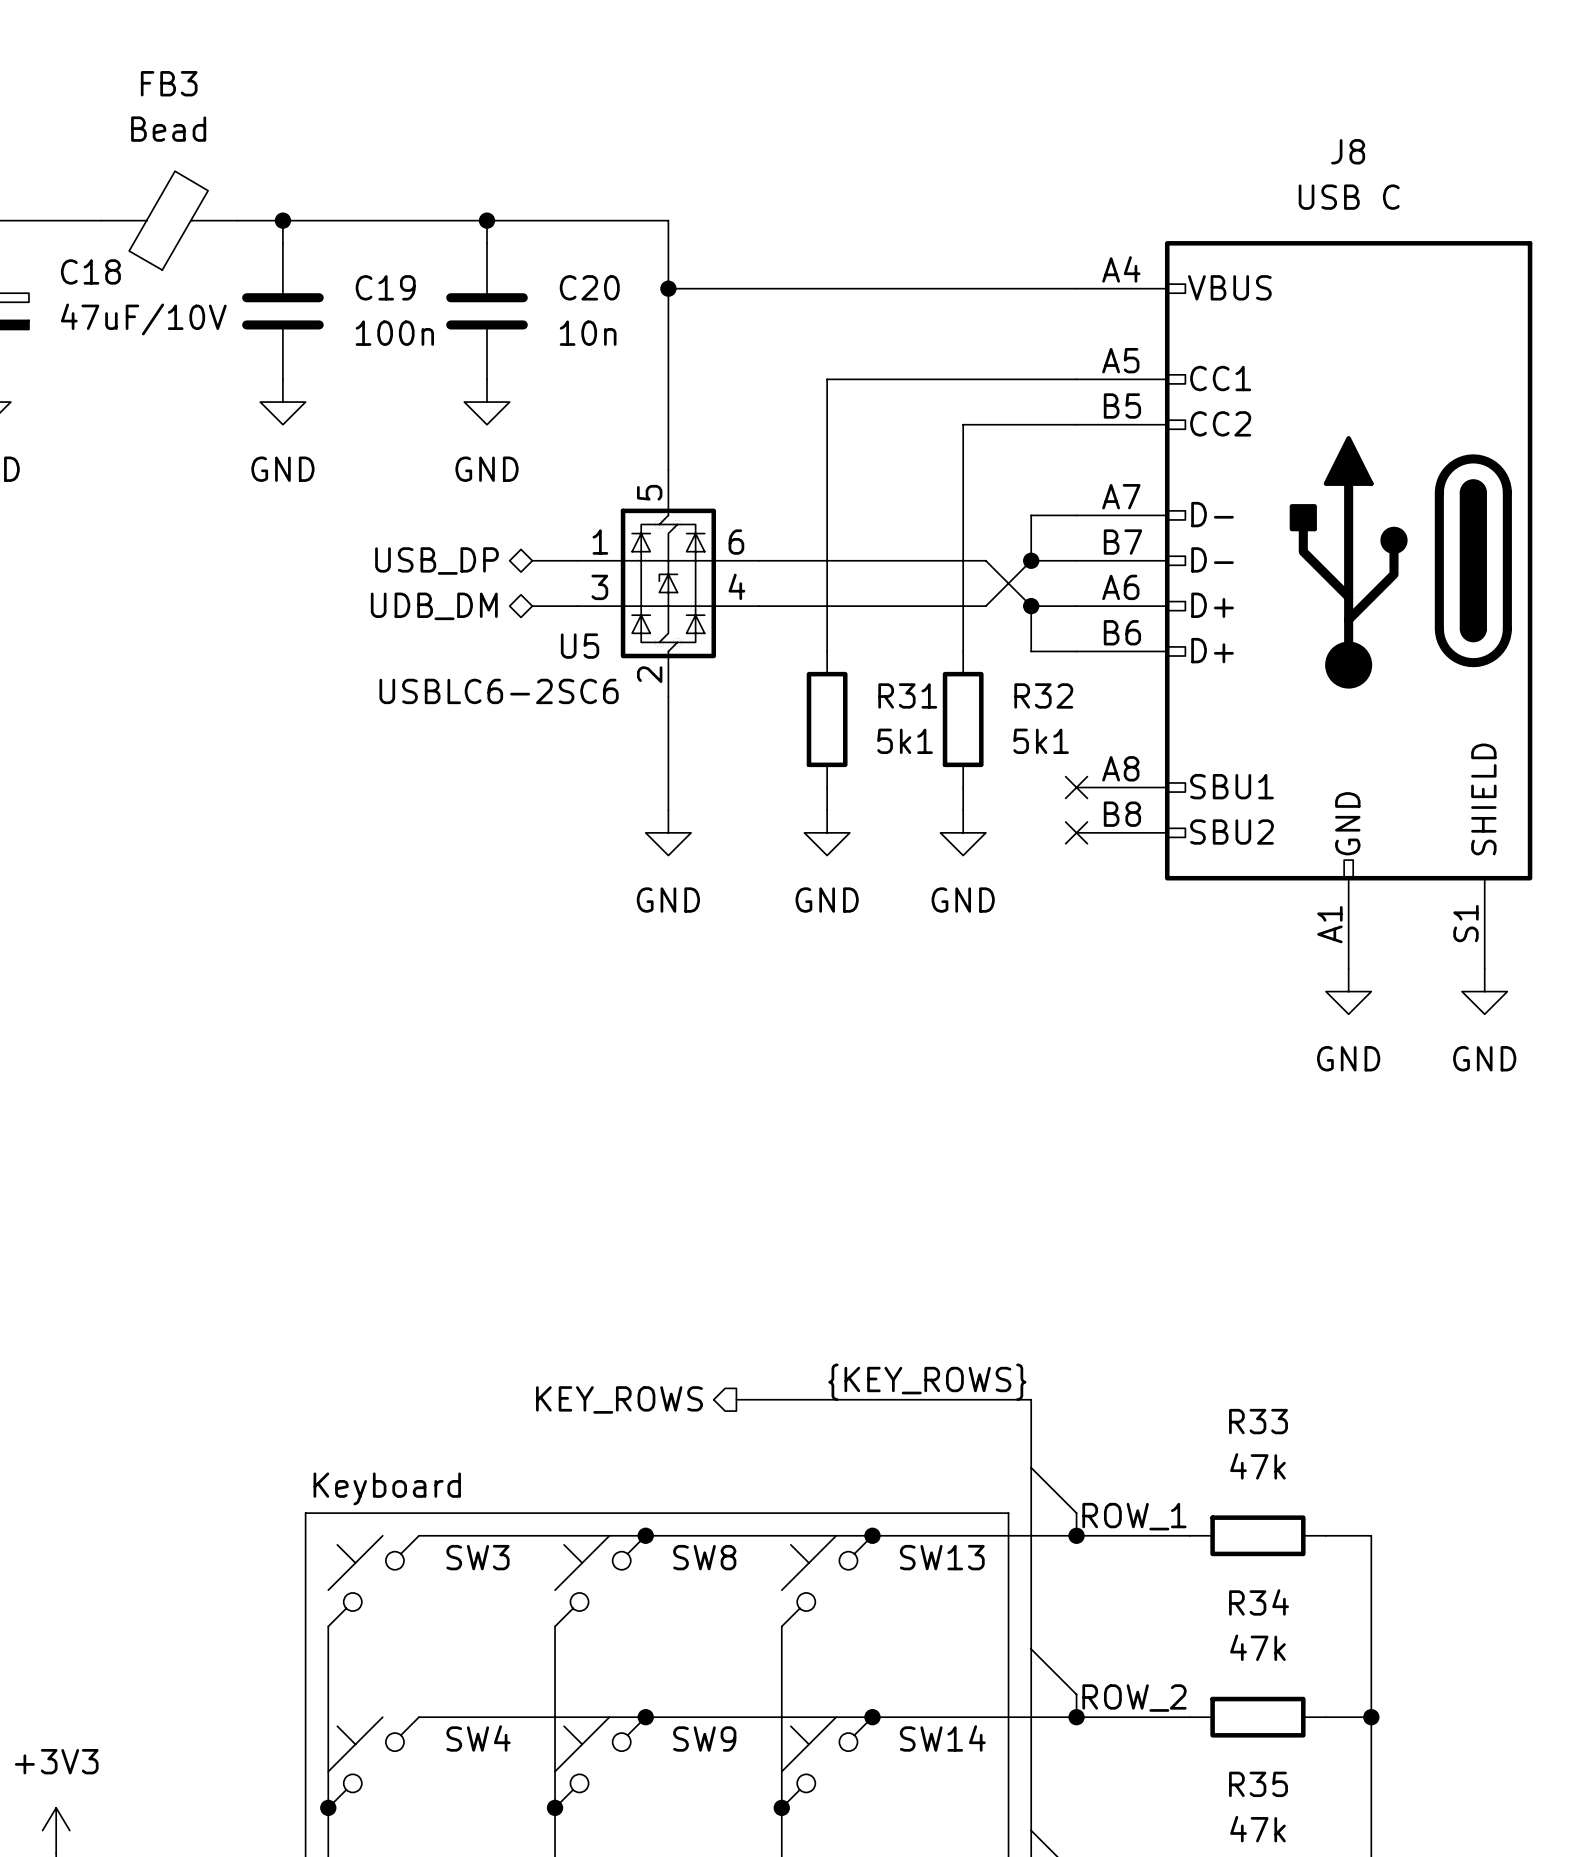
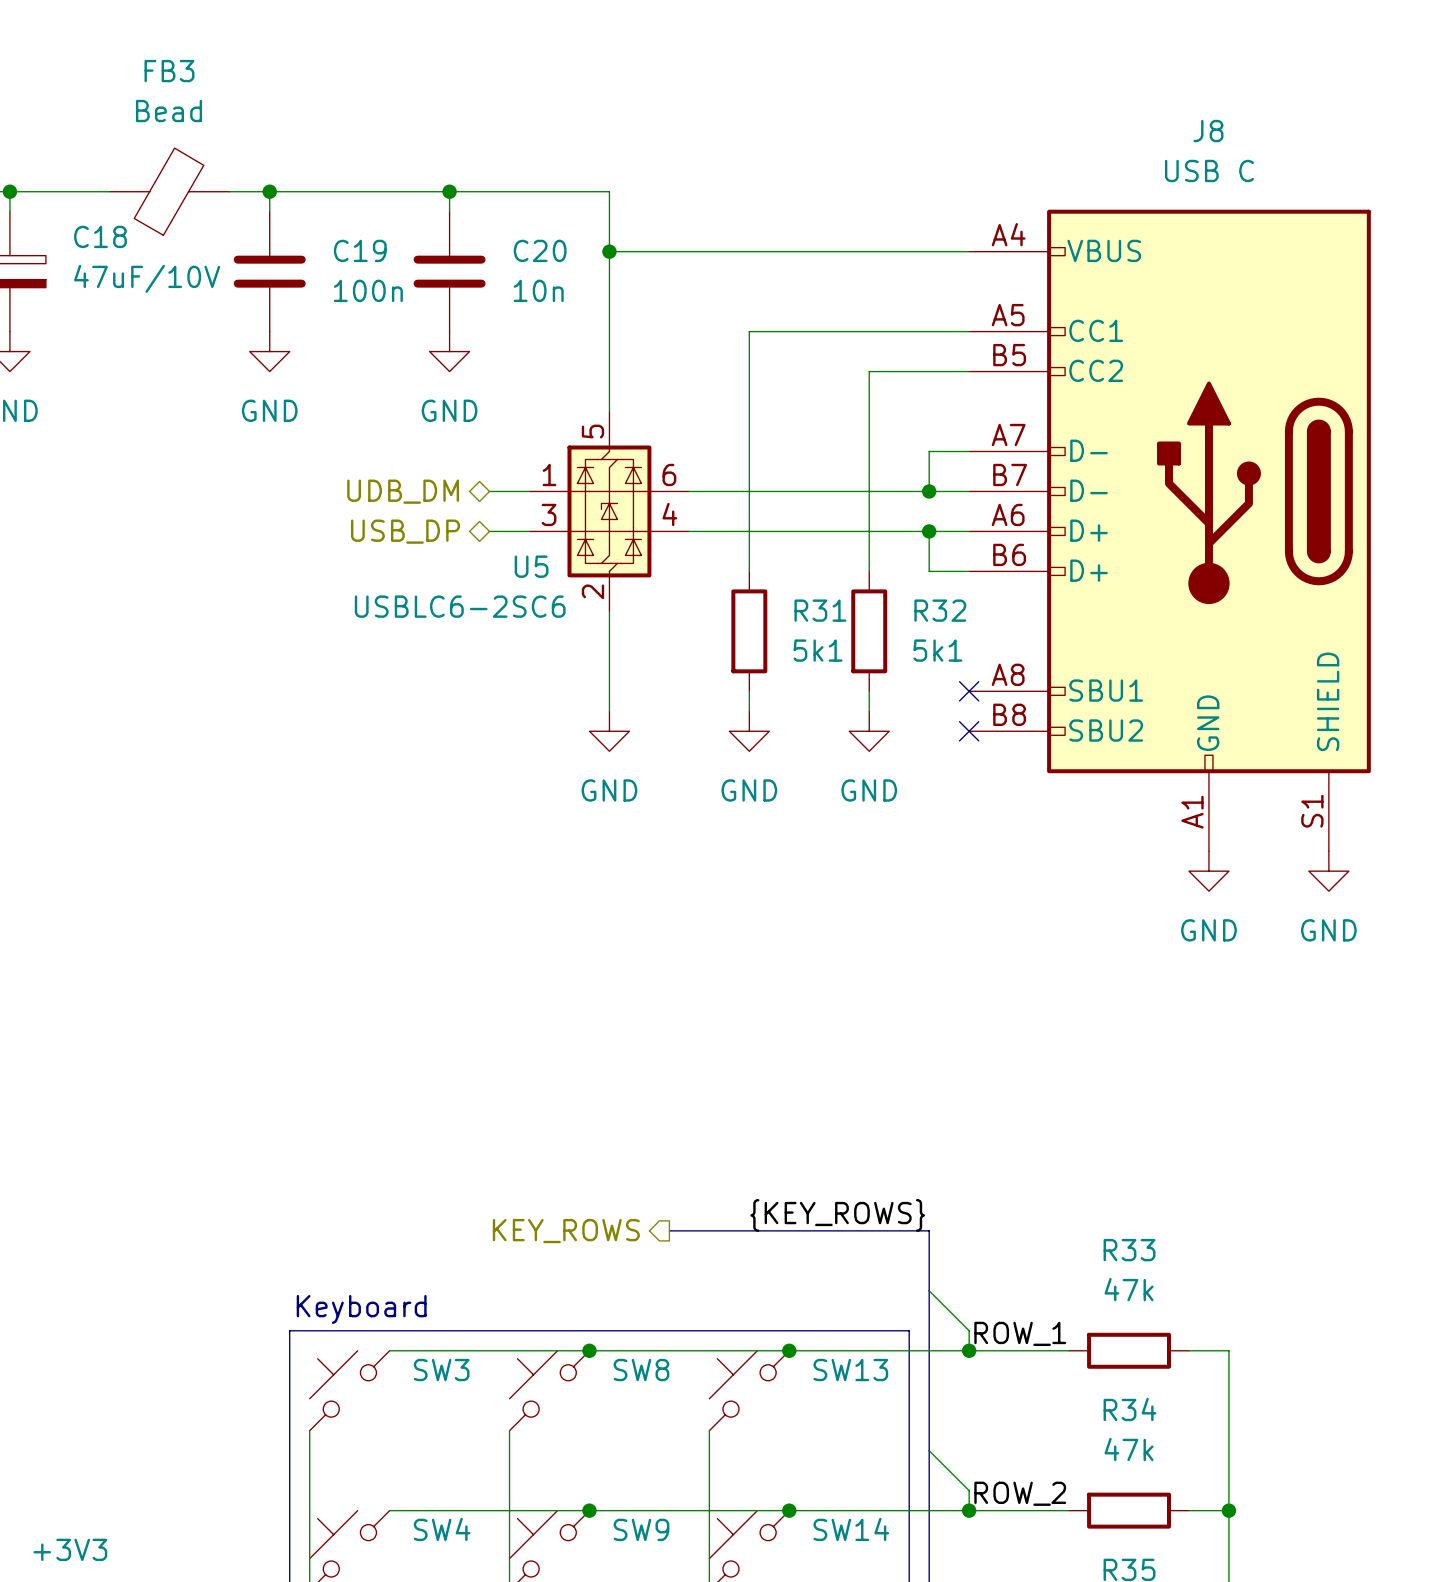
wire: (985, 560) (1031, 606) -> (889, 491) (929, 491)
wire: (1031, 560) (985, 606) -> (929, 531) (889, 531)
hierarchical label: USB_DP (436, 561) -> UDB_DM (403, 491)
hierarchical label: UDB_DM (434, 606) -> USB_DP (405, 531)

